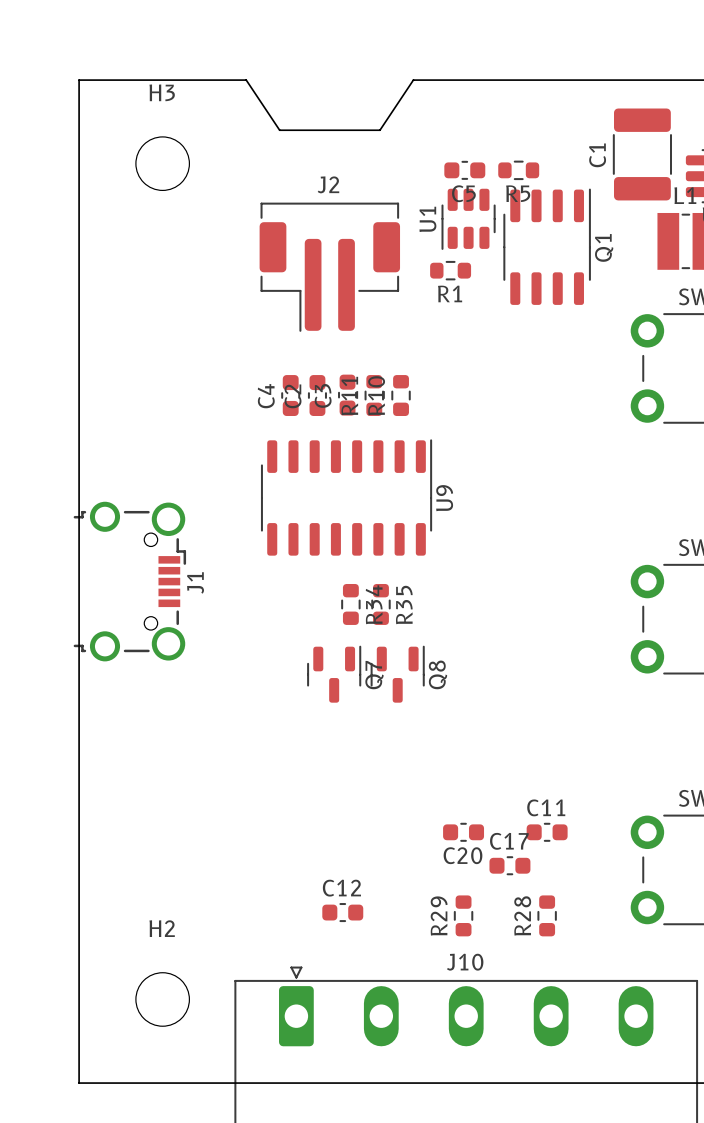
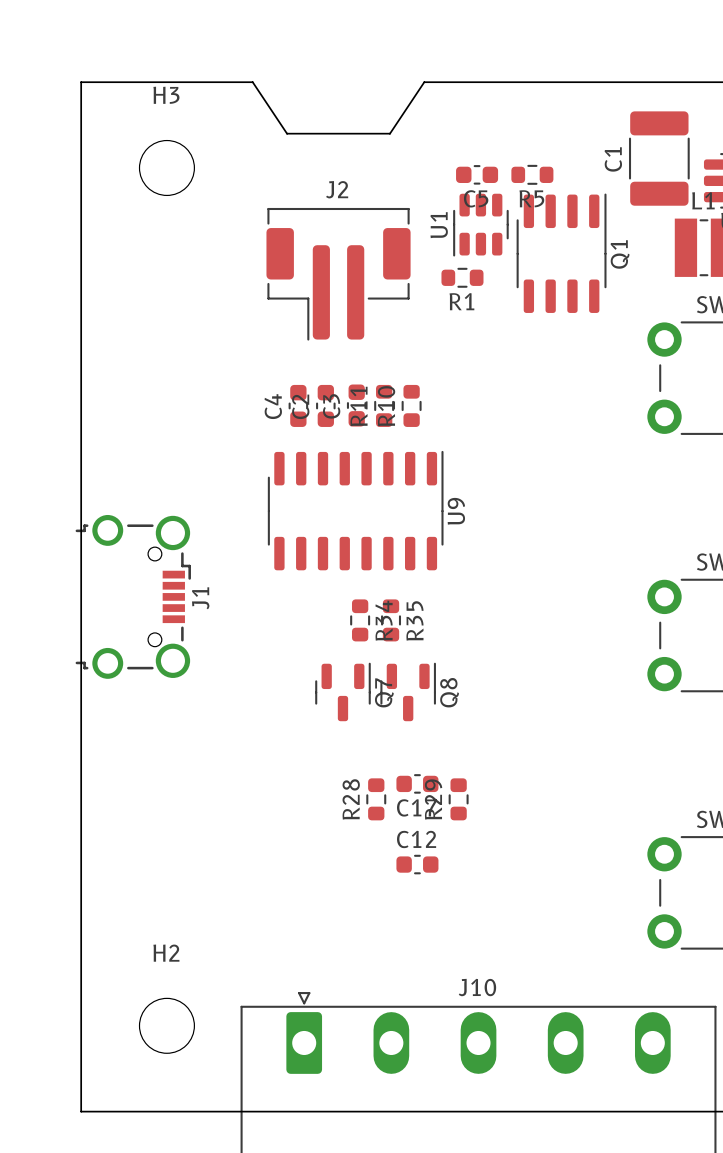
C20: (463, 832) -> none
C11: (547, 832) -> none
C17 name position: C17 (509, 841) -> C17 (416, 807)
C17 position: (509, 865) -> (417, 783)
C12 position: (342, 912) -> (417, 864)
R29 position: (463, 915) -> (458, 799)
R28 position: (547, 915) -> (376, 799)

